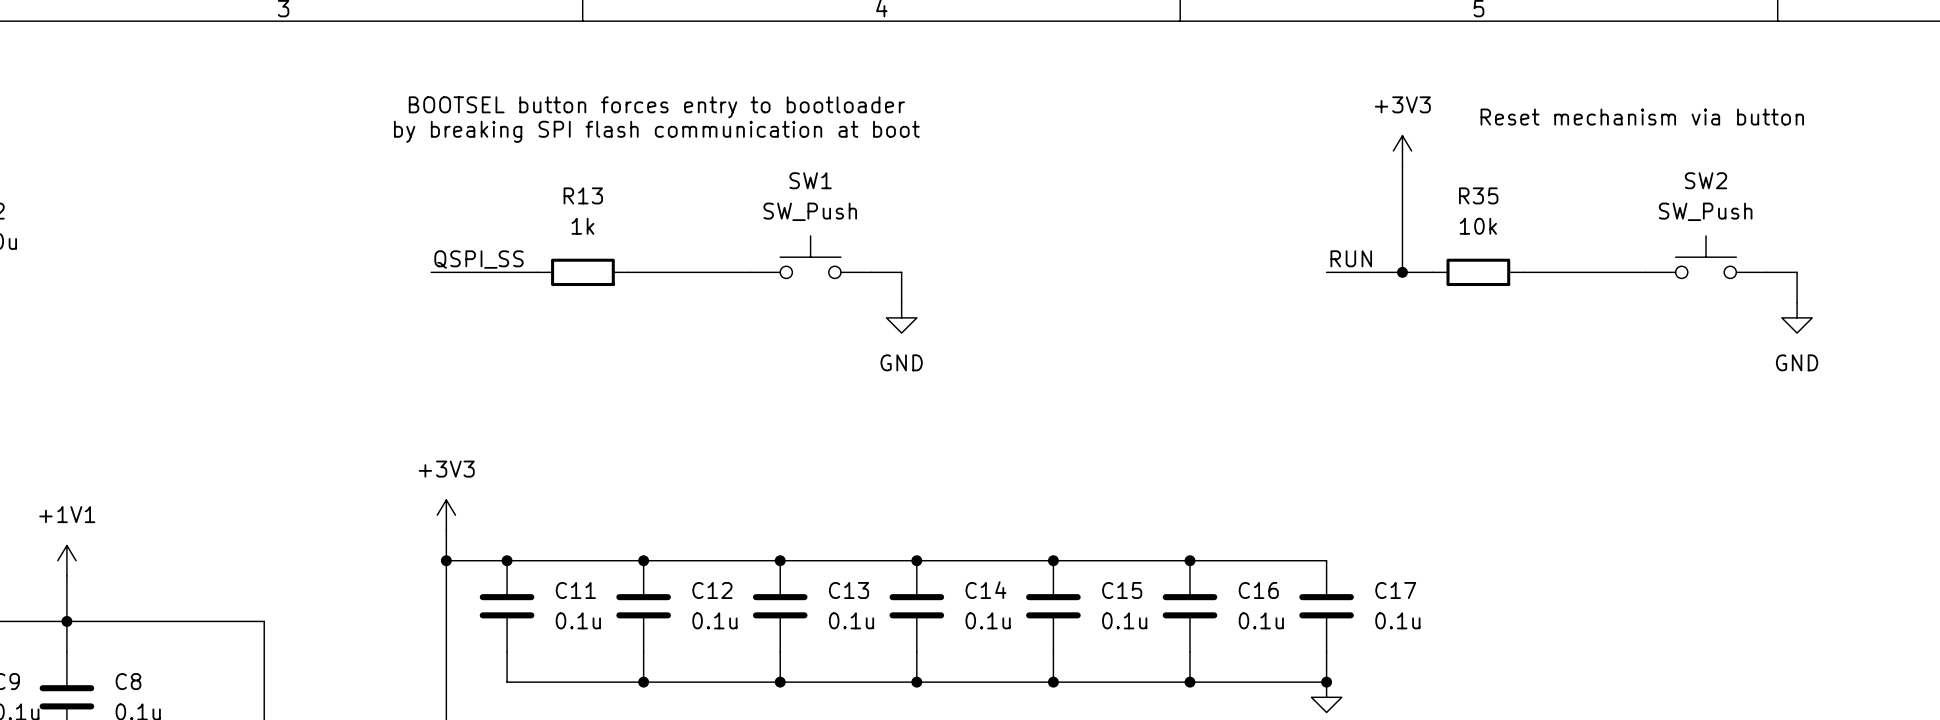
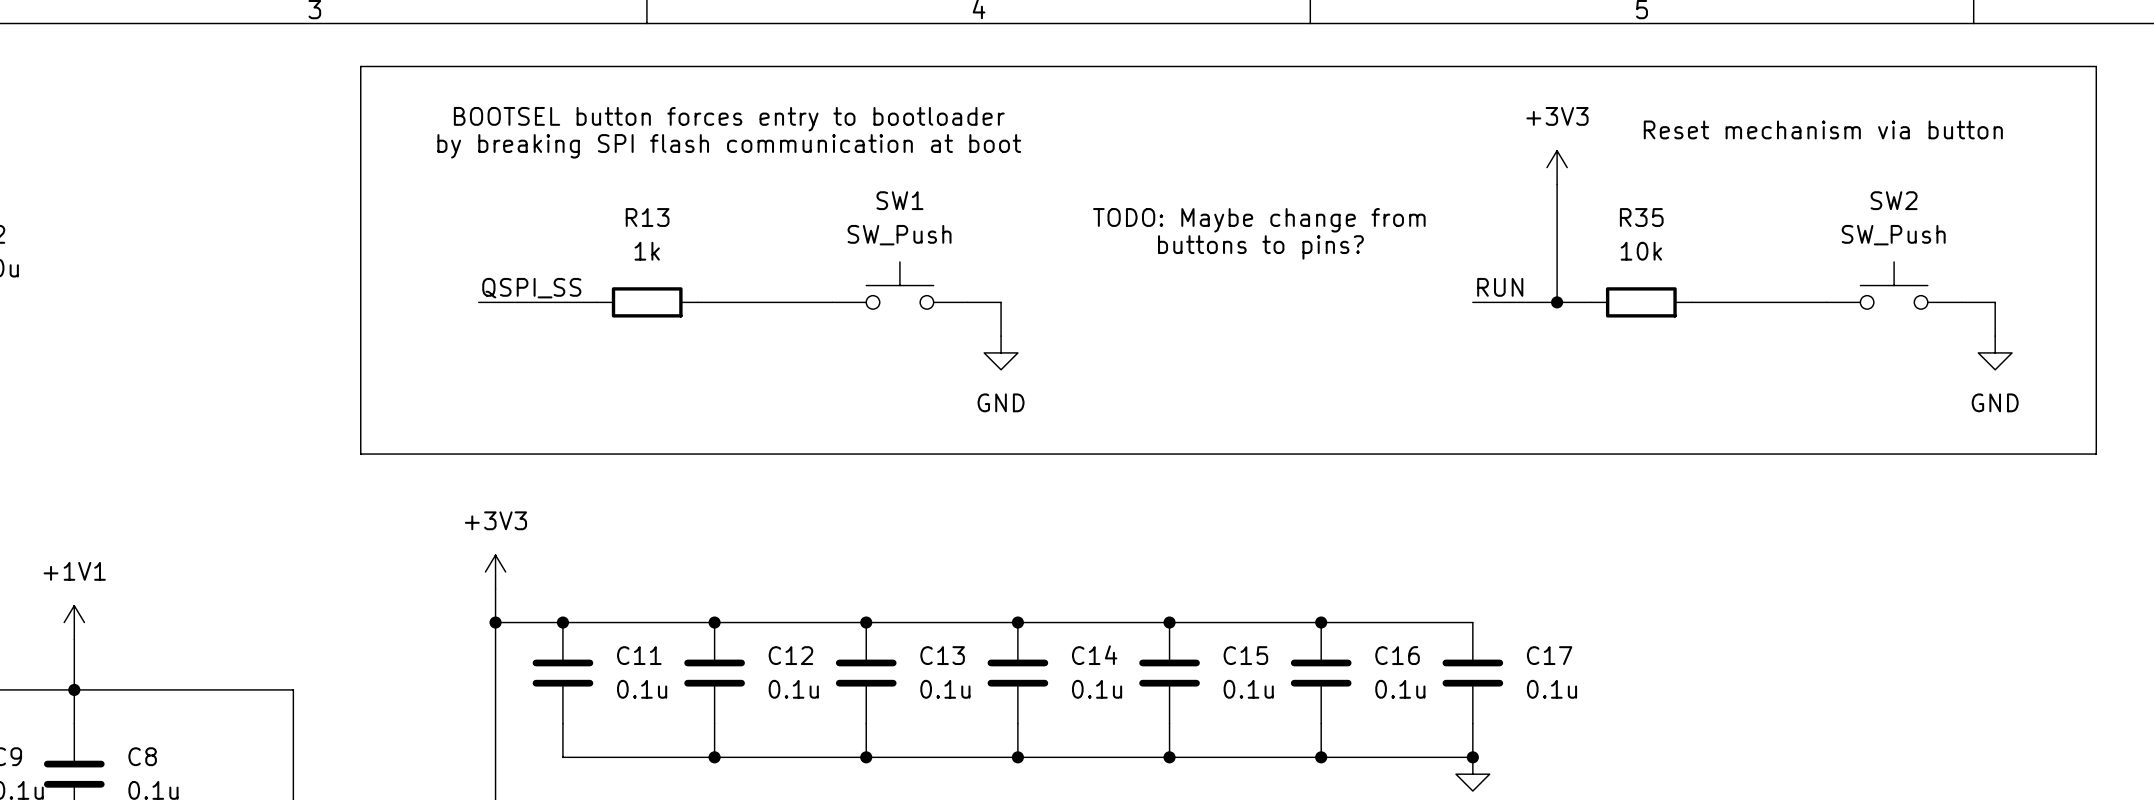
line: none -> (360, 66) (2096, 66) (2096, 454) (360, 454) (360, 66)
text: none -> TODO: Maybe change from (1259, 220)
text: none -> buttons to pins? (1260, 247)

